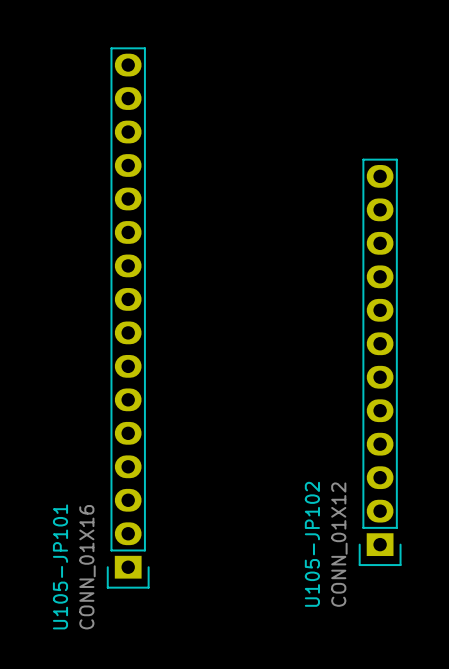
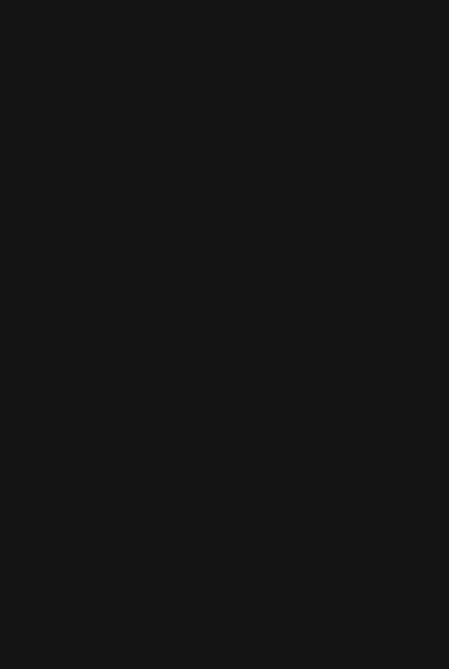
U105-JP101: CONN_01X16 (128, 317) -> none
U105-JP102: CONN_01X12 (380, 362) -> none

